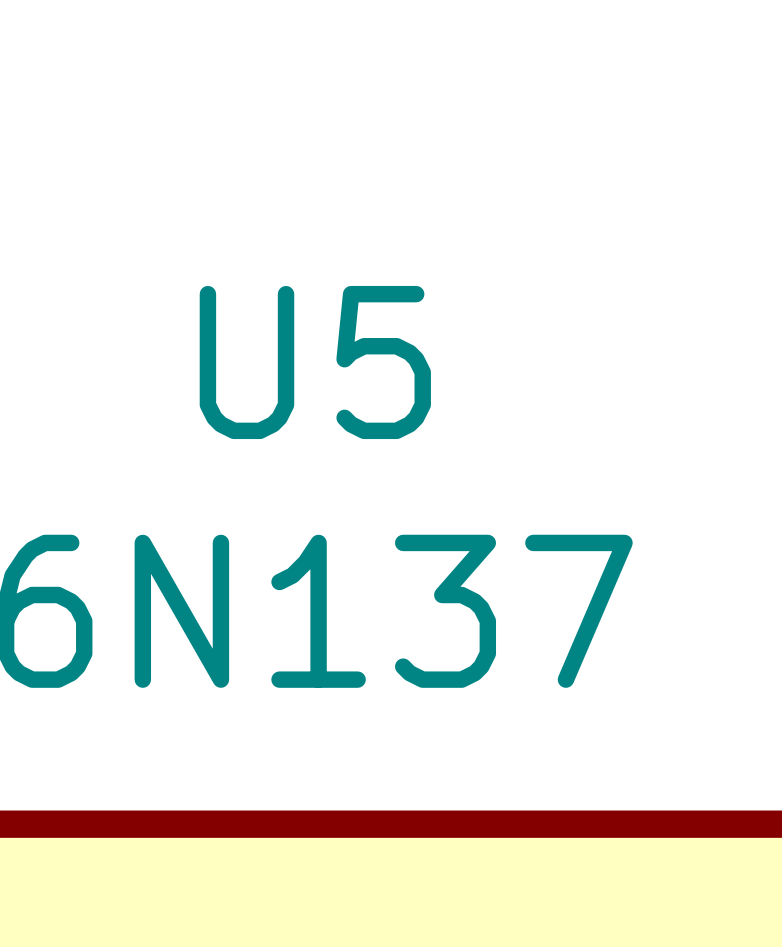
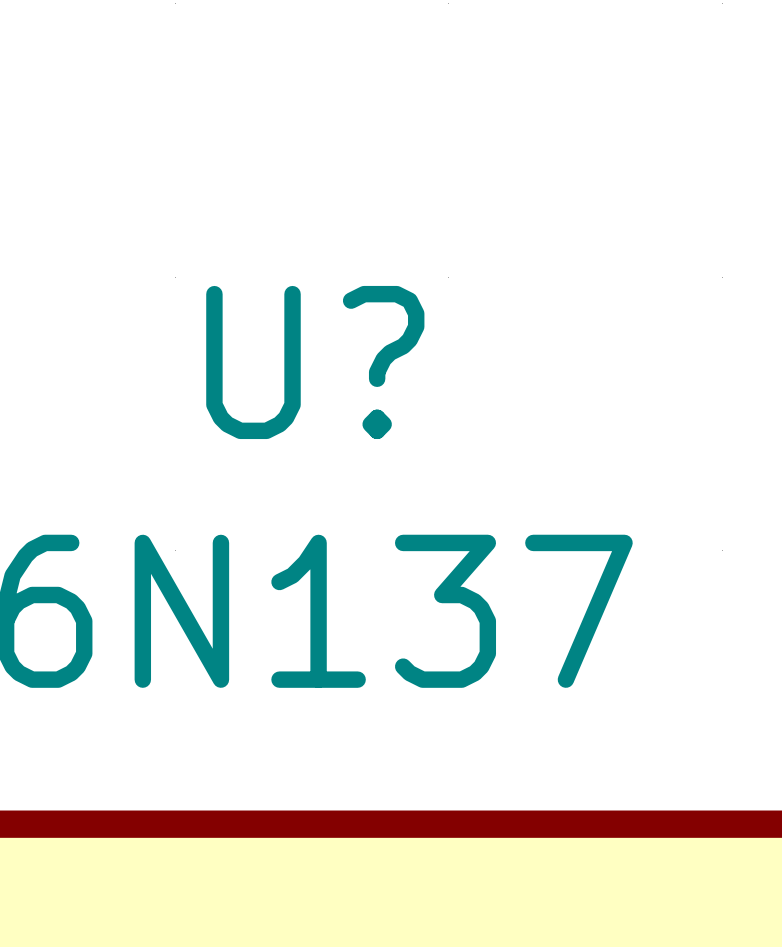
U5 name: U5 (315, 362) -> U? (315, 362)

